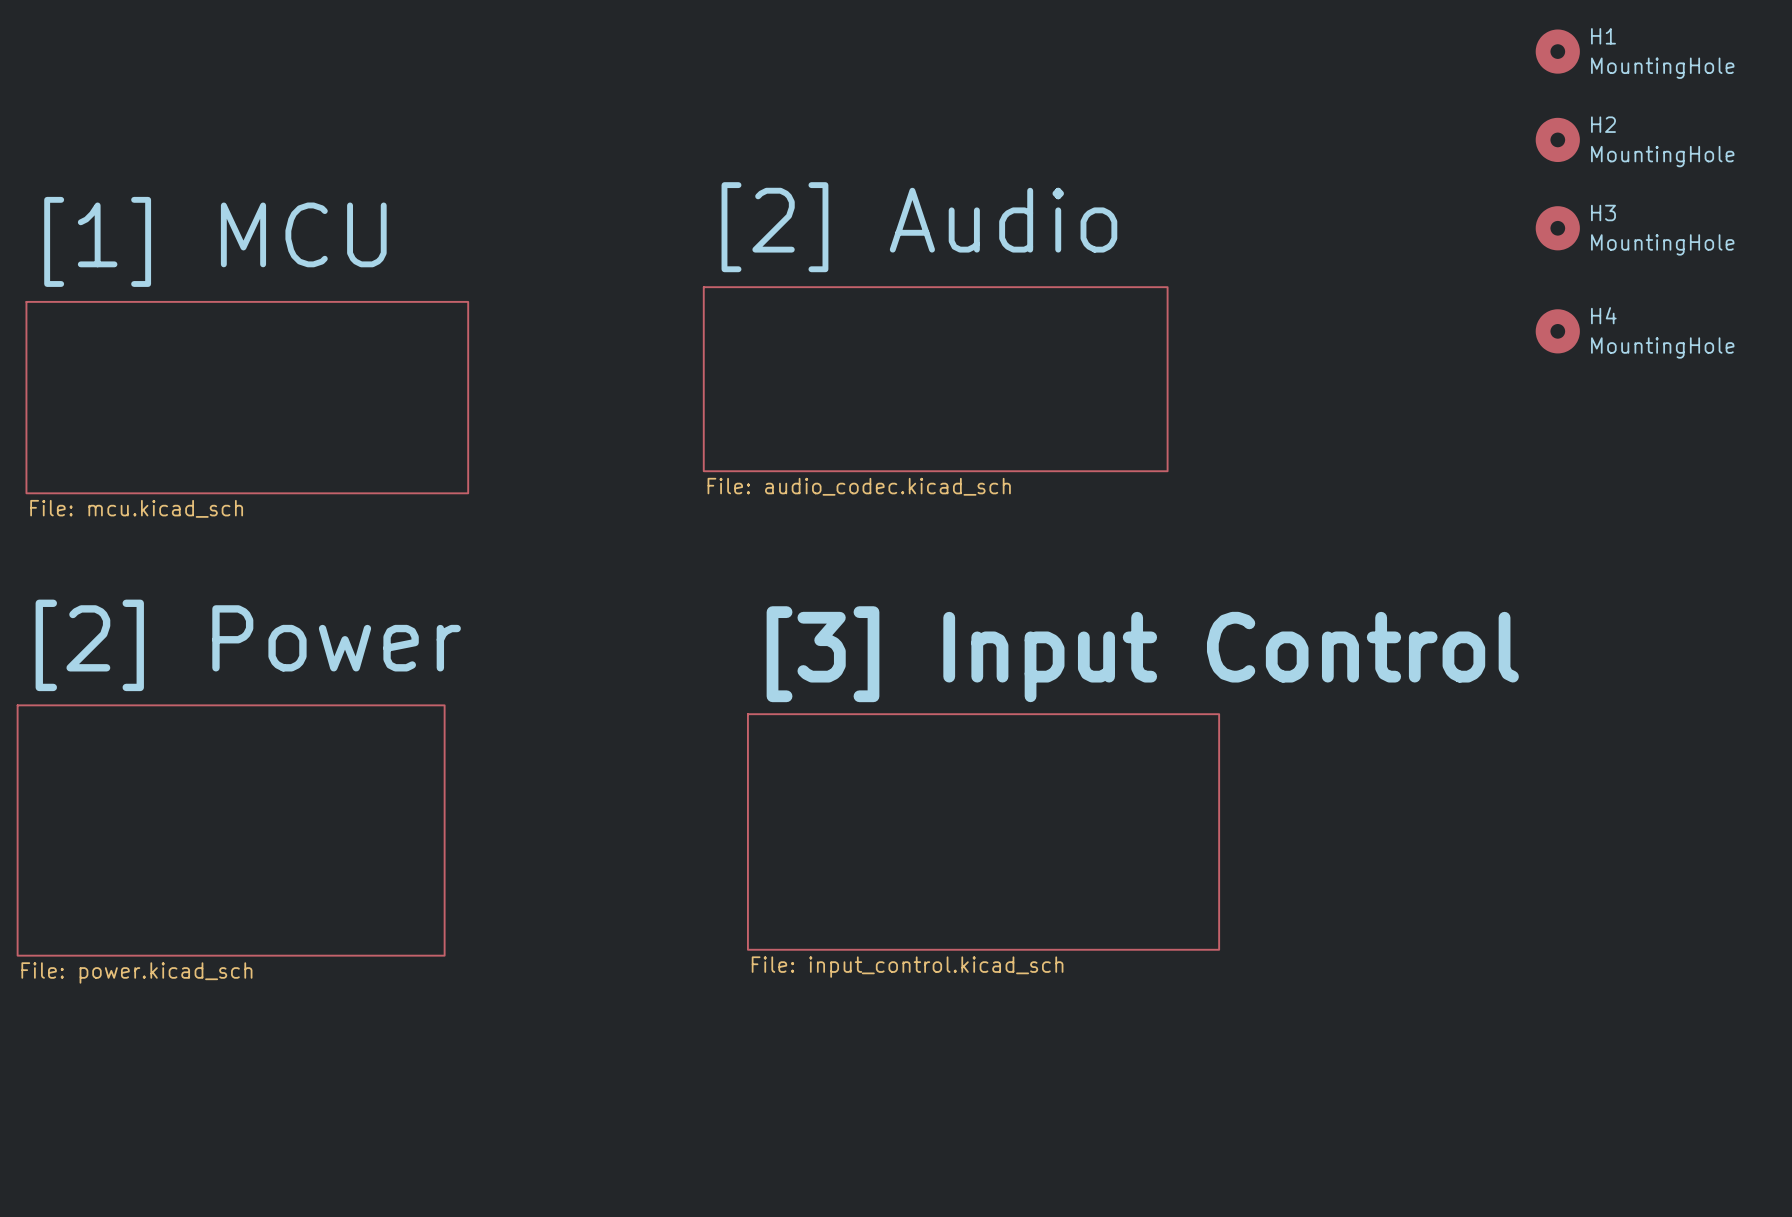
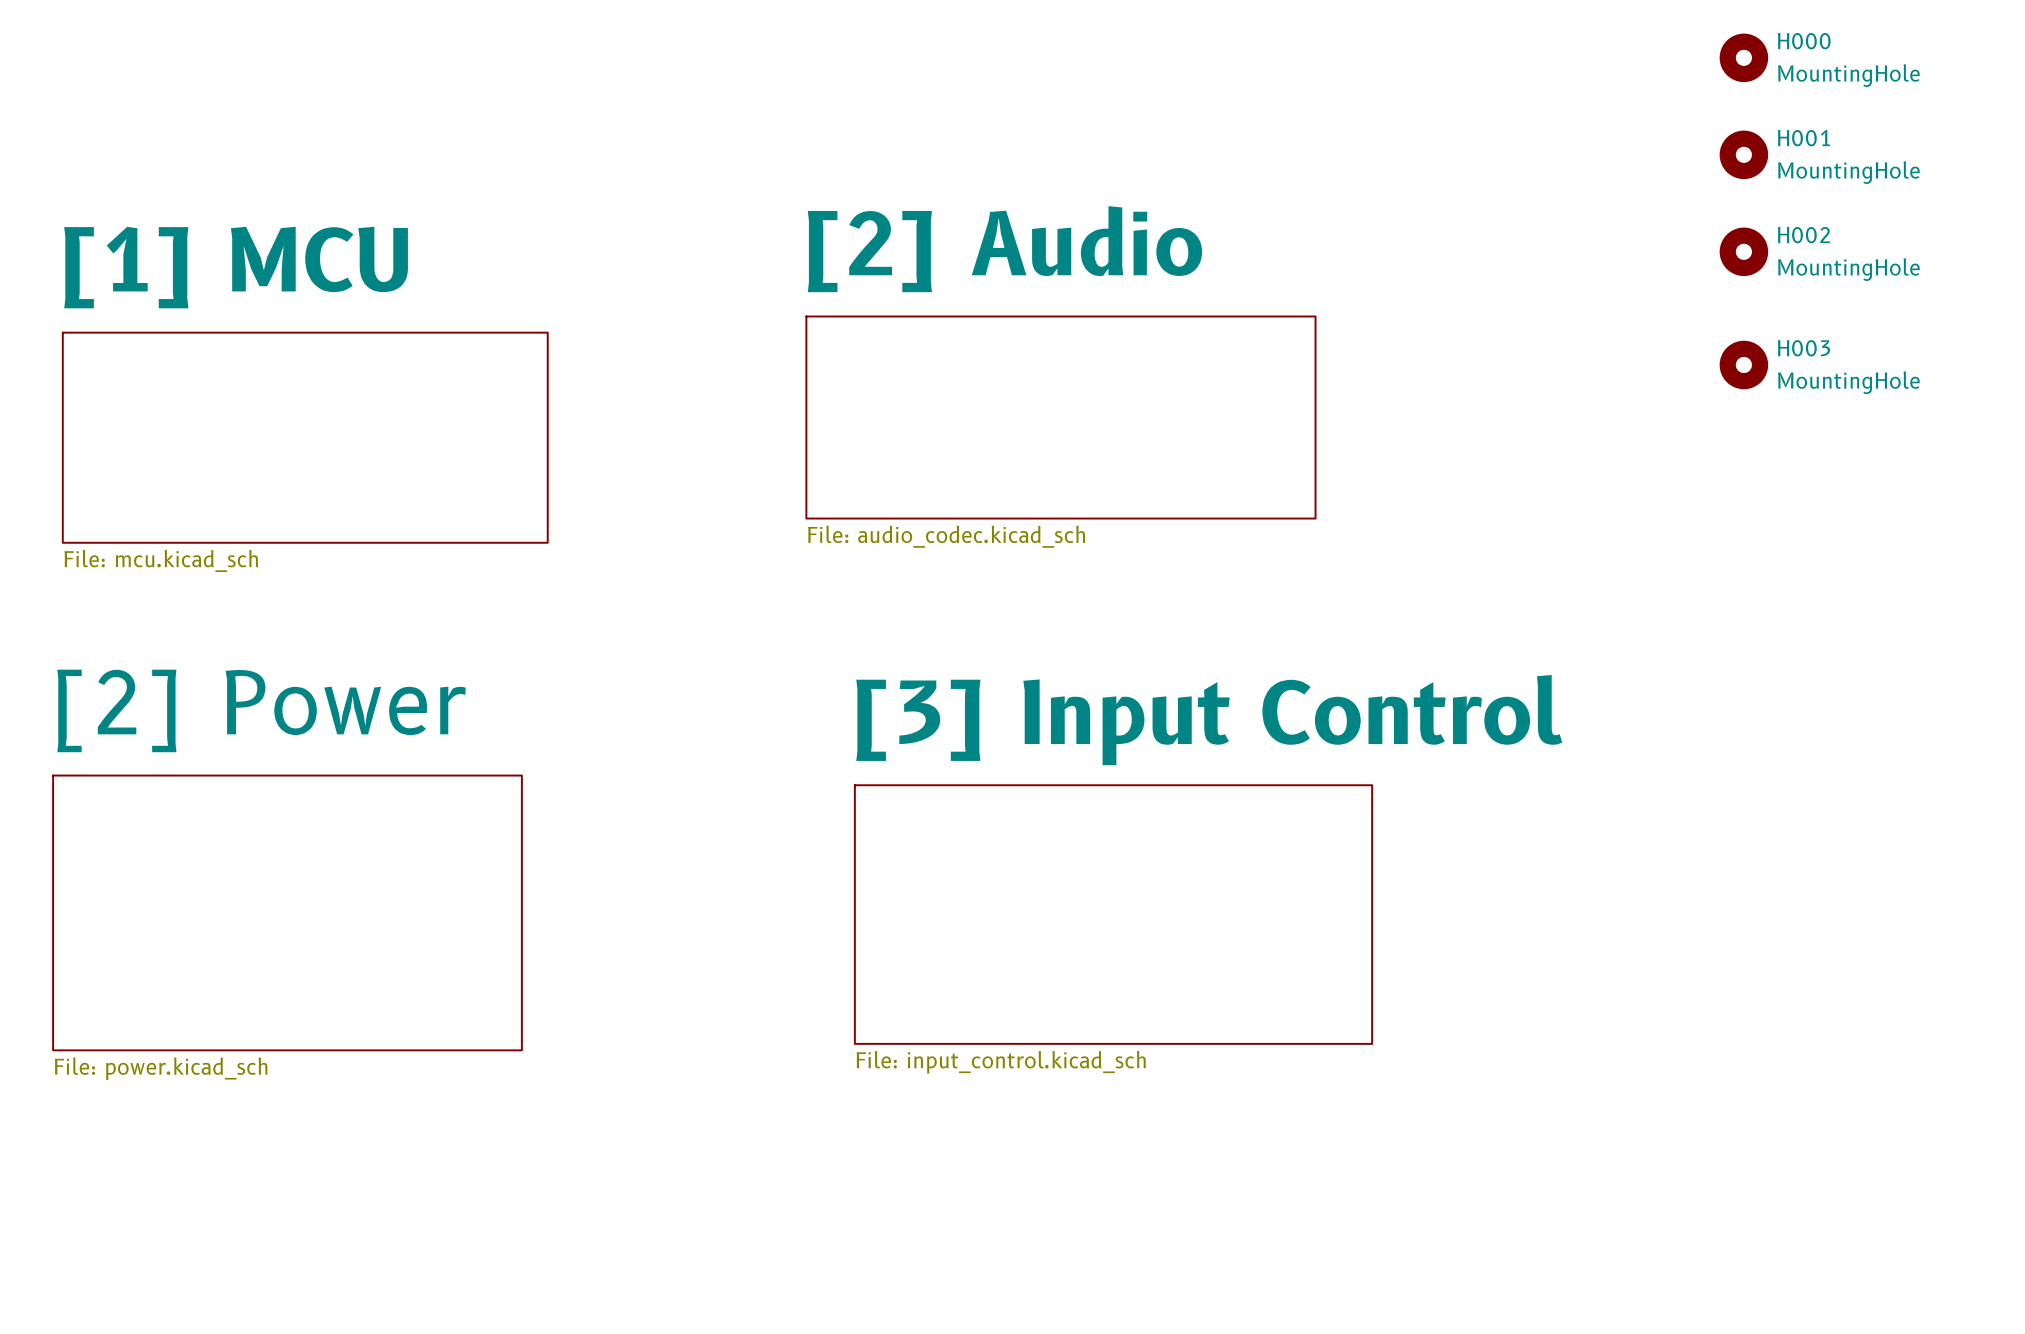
H1 name: H1 (1603, 36) -> H000 (1804, 41)
H2 name: H2 (1603, 124) -> H001 (1803, 138)
H3 name: H3 (1603, 213) -> H002 (1803, 235)
H4 name: H4 (1603, 315) -> H003 (1803, 348)

